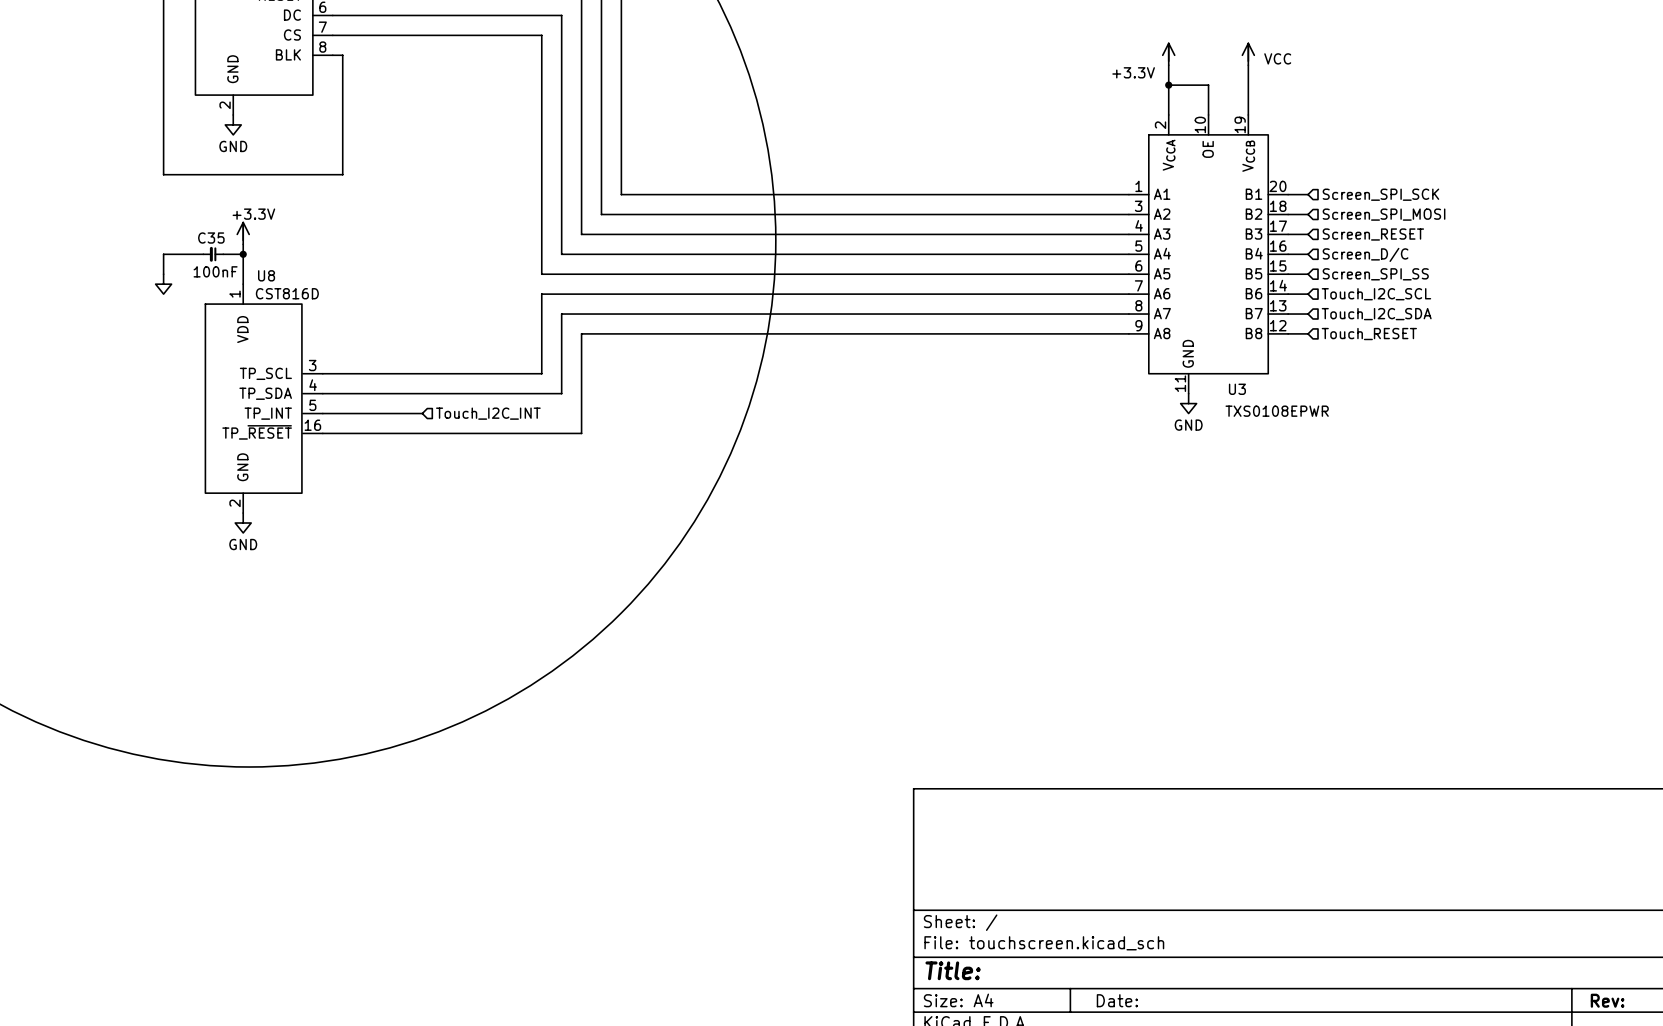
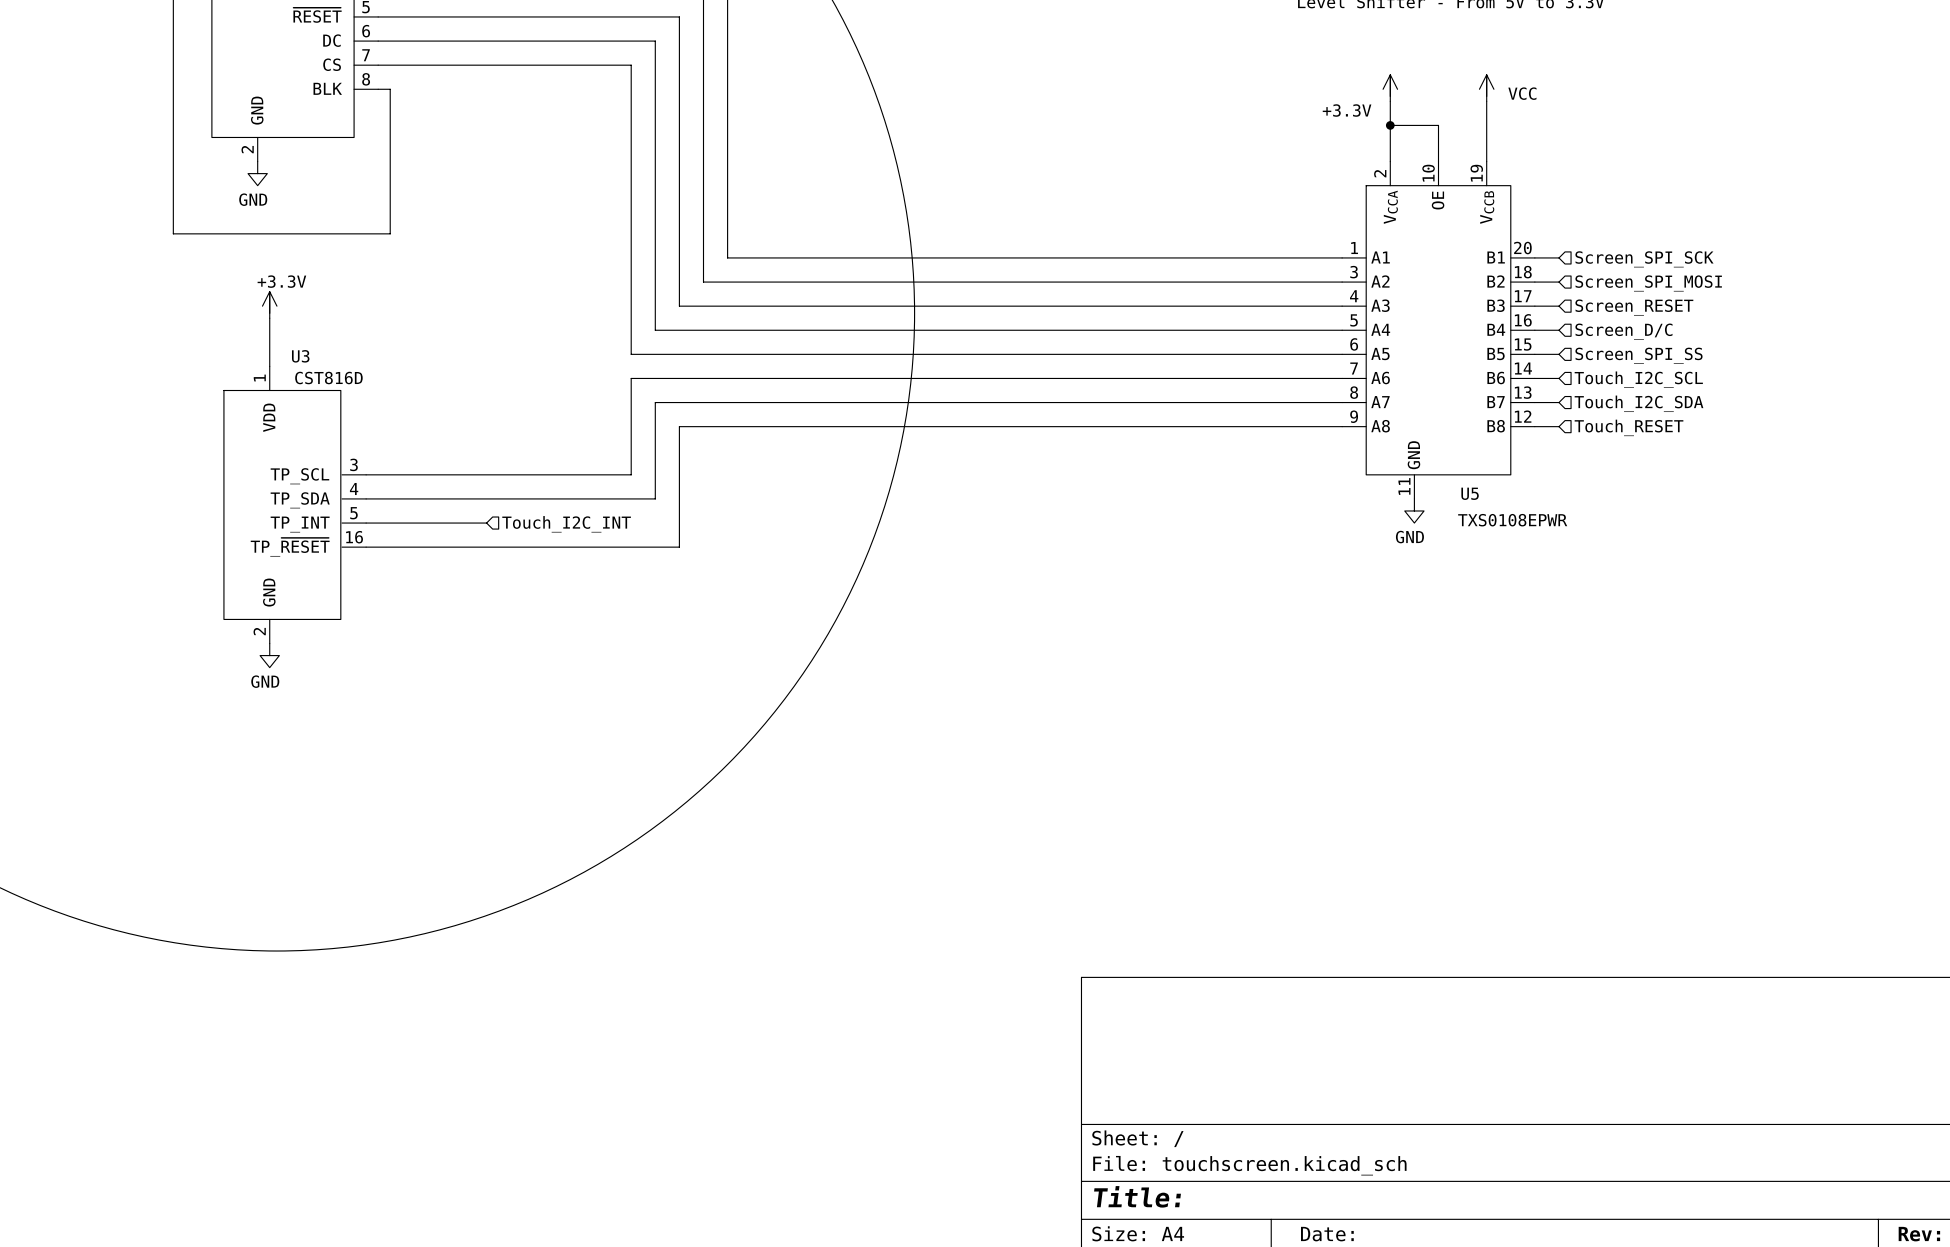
wire: (203, 254) (163, 254) (163, 274) -> none
C35: 100nF (213, 254) -> none
wire: (223, 254) (243, 254) -> none
junction: (243, 254) -> none
U8 name: U8 (266, 275) -> U3 (300, 356)
power symbol: (163, 284) -> none
U3 name: U3 (1237, 389) -> U5 (1470, 493)

